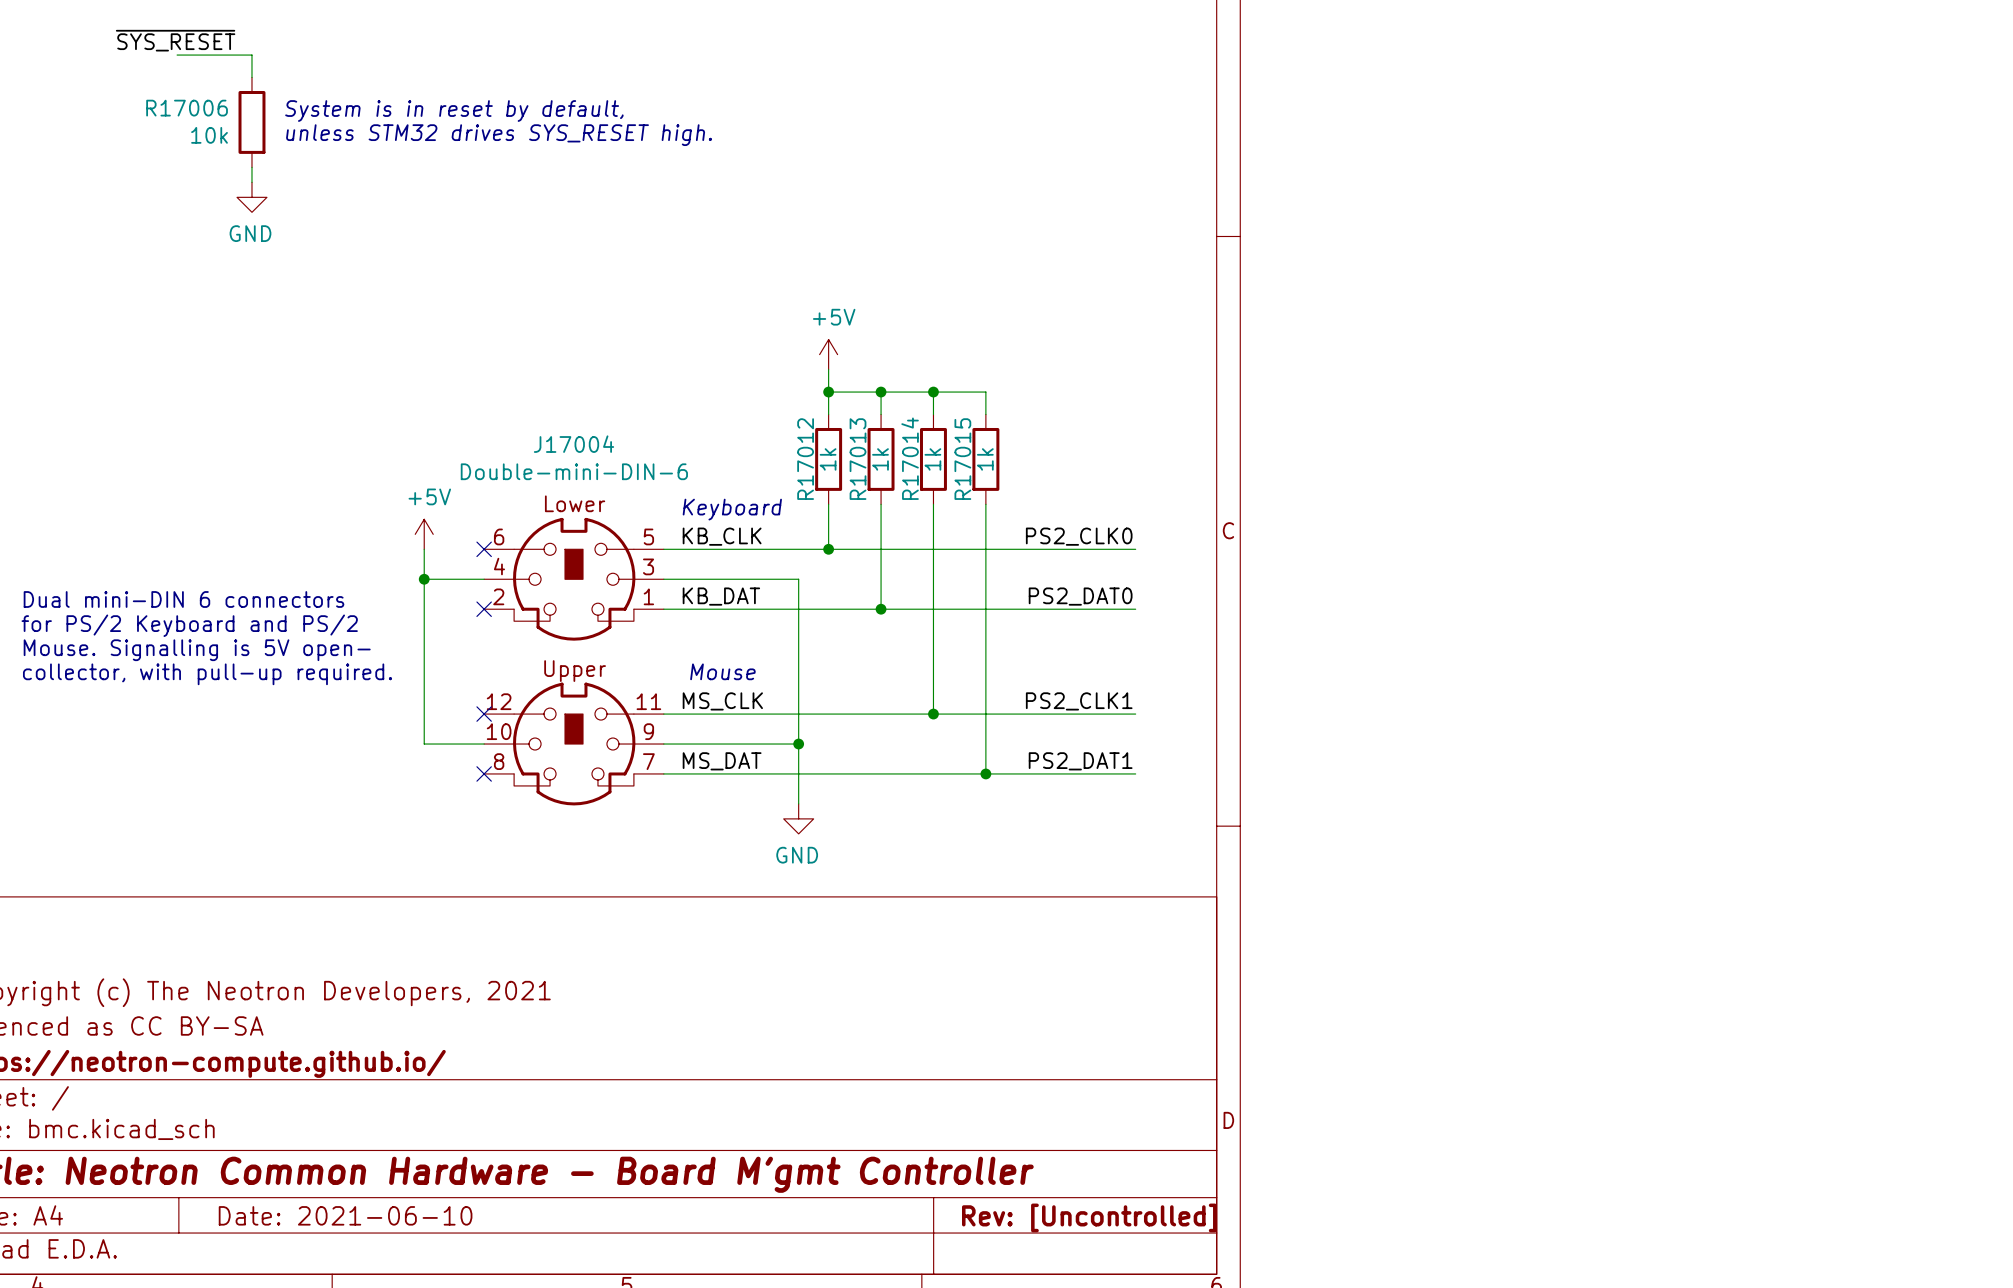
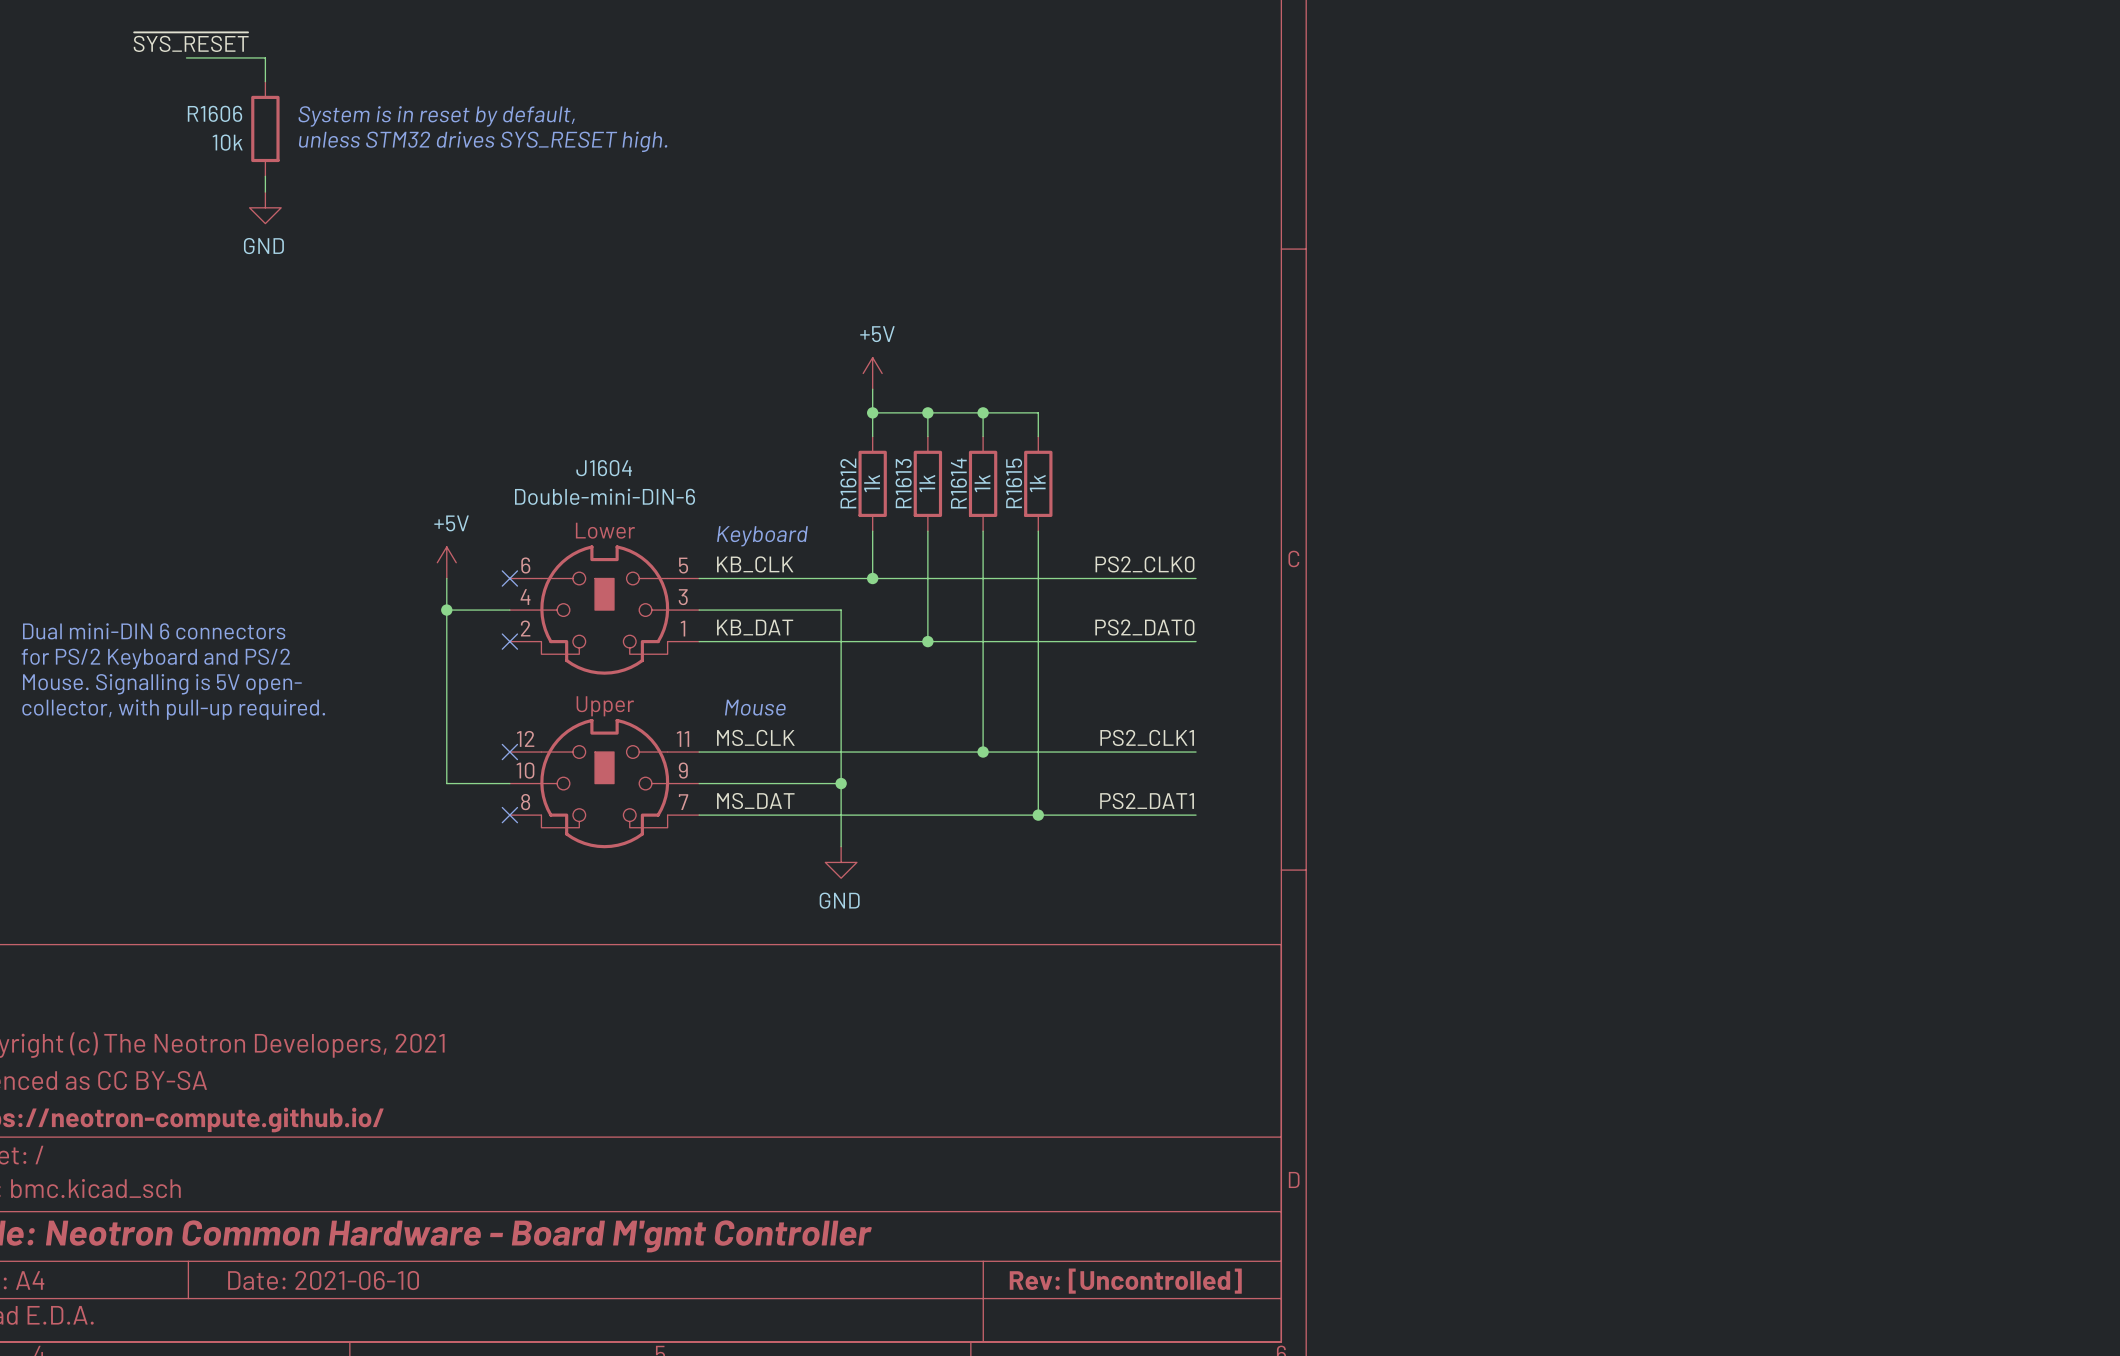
R17006 name: R17006 (187, 108) -> R1606 (214, 113)
J17004 name: J17004 (574, 444) -> J1604 (604, 468)
R17014 name: R17014 (910, 458) -> R1614 (958, 483)
R17012 name: R17012 (805, 459) -> R1612 (848, 483)
R17013 name: R17013 (858, 459) -> R1613 (903, 483)
R17015 name: R17015 (962, 459) -> R1615 (1014, 483)

